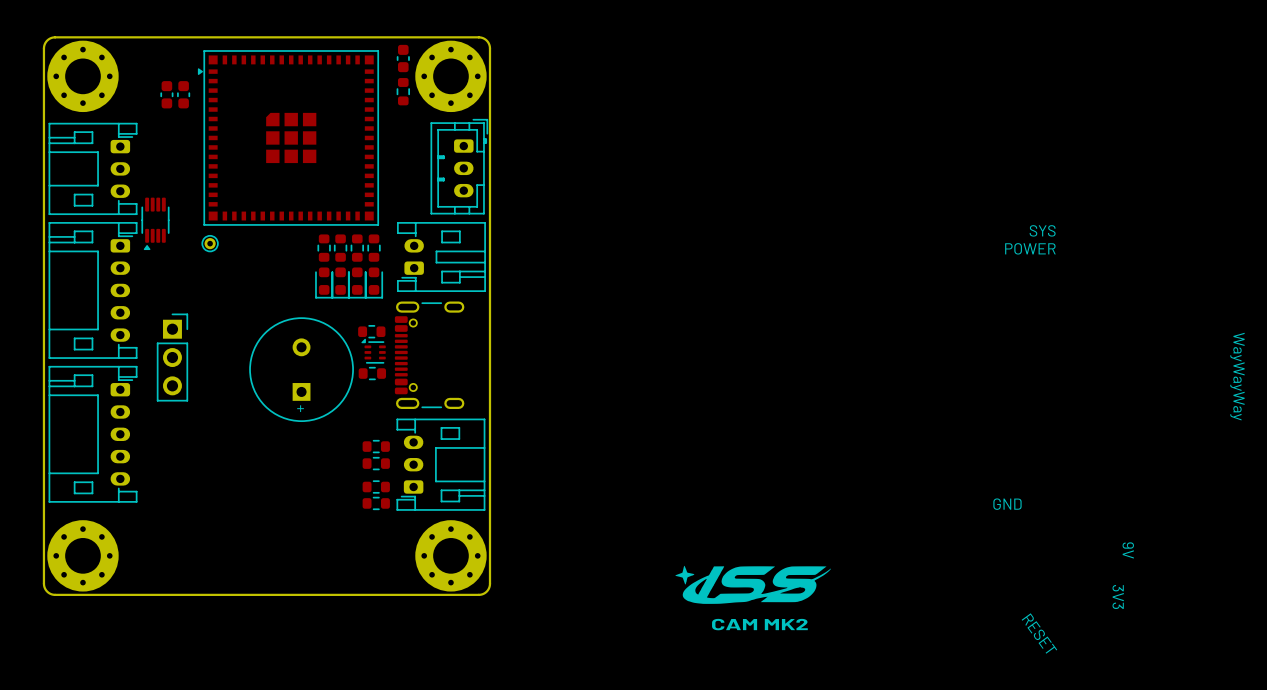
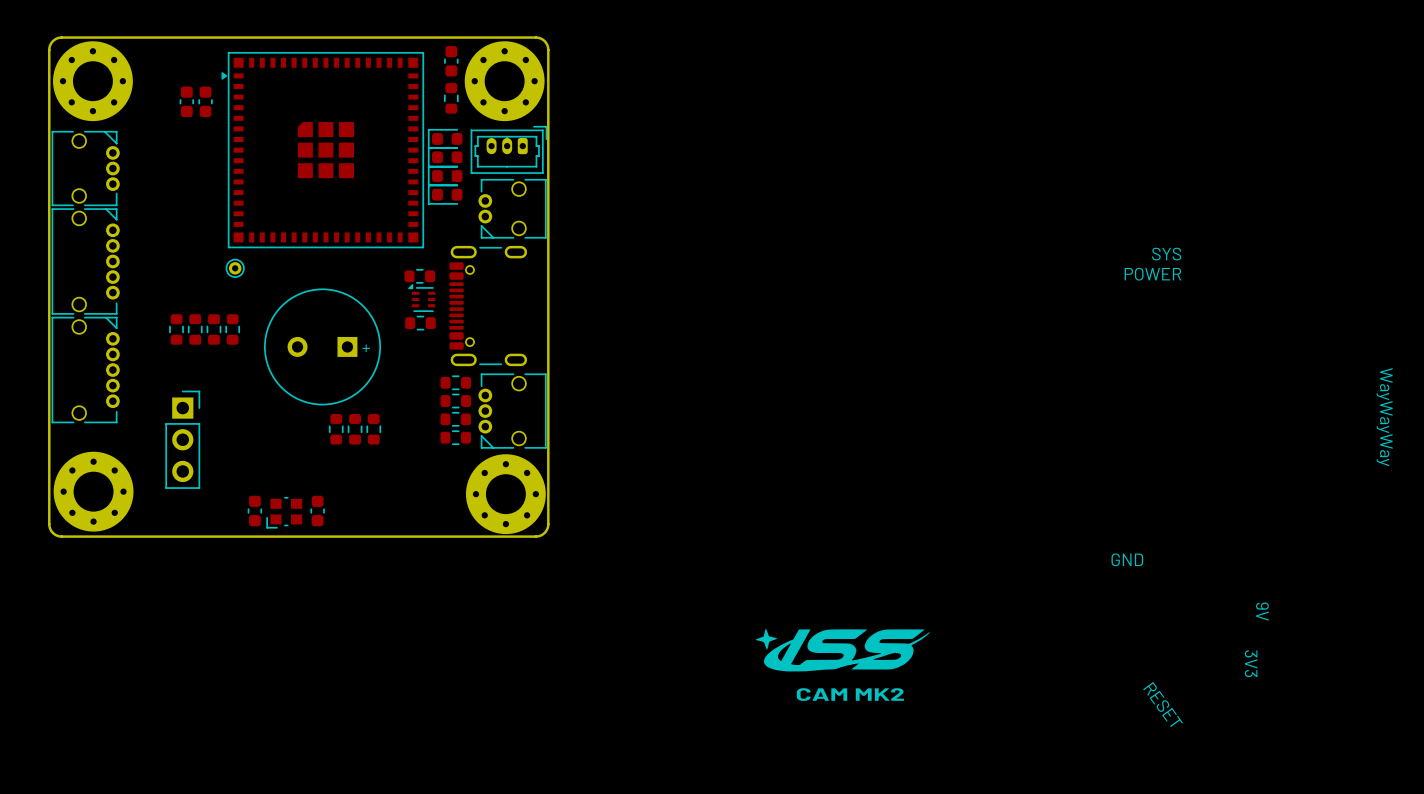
part: none -> (445, 138)
part: none -> (508, 149)
part: none -> (445, 157)
part: none -> (85, 168)
part: none -> (445, 176)
part: (459, 166) -> none
part: (93, 168) -> none
part: none -> (445, 194)
part: none -> (512, 208)
part: (155, 223) -> none
part: none -> (85, 261)
part: (324, 248) -> none
part: (340, 248) -> none
part: (357, 248) -> none
part rotation: 0° (374, 248) -> 90° clockwise (419, 276)
part: (441, 257) -> none
part: (324, 282) -> none
part: (340, 282) -> none
part: (357, 282) -> none
part: (374, 282) -> none
part: (93, 290) -> none
part: none -> (420, 323)
part: none -> (176, 329)
part: none -> (195, 329)
part: none -> (213, 329)
part: none -> (232, 329)
part: (371, 331) -> none
part: none -> (85, 370)
part: none -> (455, 382)
part position: (373, 351) -> (421, 298)
part position: (429, 355) -> (488, 306)
part position: (172, 357) -> (182, 439)
part: none -> (455, 401)
part rotation: 0° (301, 369) -> 90° counterclockwise (322, 346)
part: none -> (512, 411)
part: (372, 373) -> none
part: none -> (455, 419)
part: none -> (336, 429)
part: none -> (355, 429)
part: none -> (373, 429)
part: none -> (455, 437)
part: (93, 434) -> none
part: (376, 446) -> none
part: none -> (254, 511)
part: none -> (317, 511)
part: none -> (284, 512)
part: (376, 463) -> none
part: (440, 464) -> none
board edge: (43, 472) (44, 584) (48, 592) (55, 594) (481, 594) (486, 591) (489, 584) (490, 472) -> (49, 524) (52, 532) (61, 536) (535, 536) (544, 532) (548, 524)
part: (376, 486) -> none
part: (376, 503) -> none
part position: (82, 555) -> (93, 491)
part position: (450, 555) -> (505, 494)

